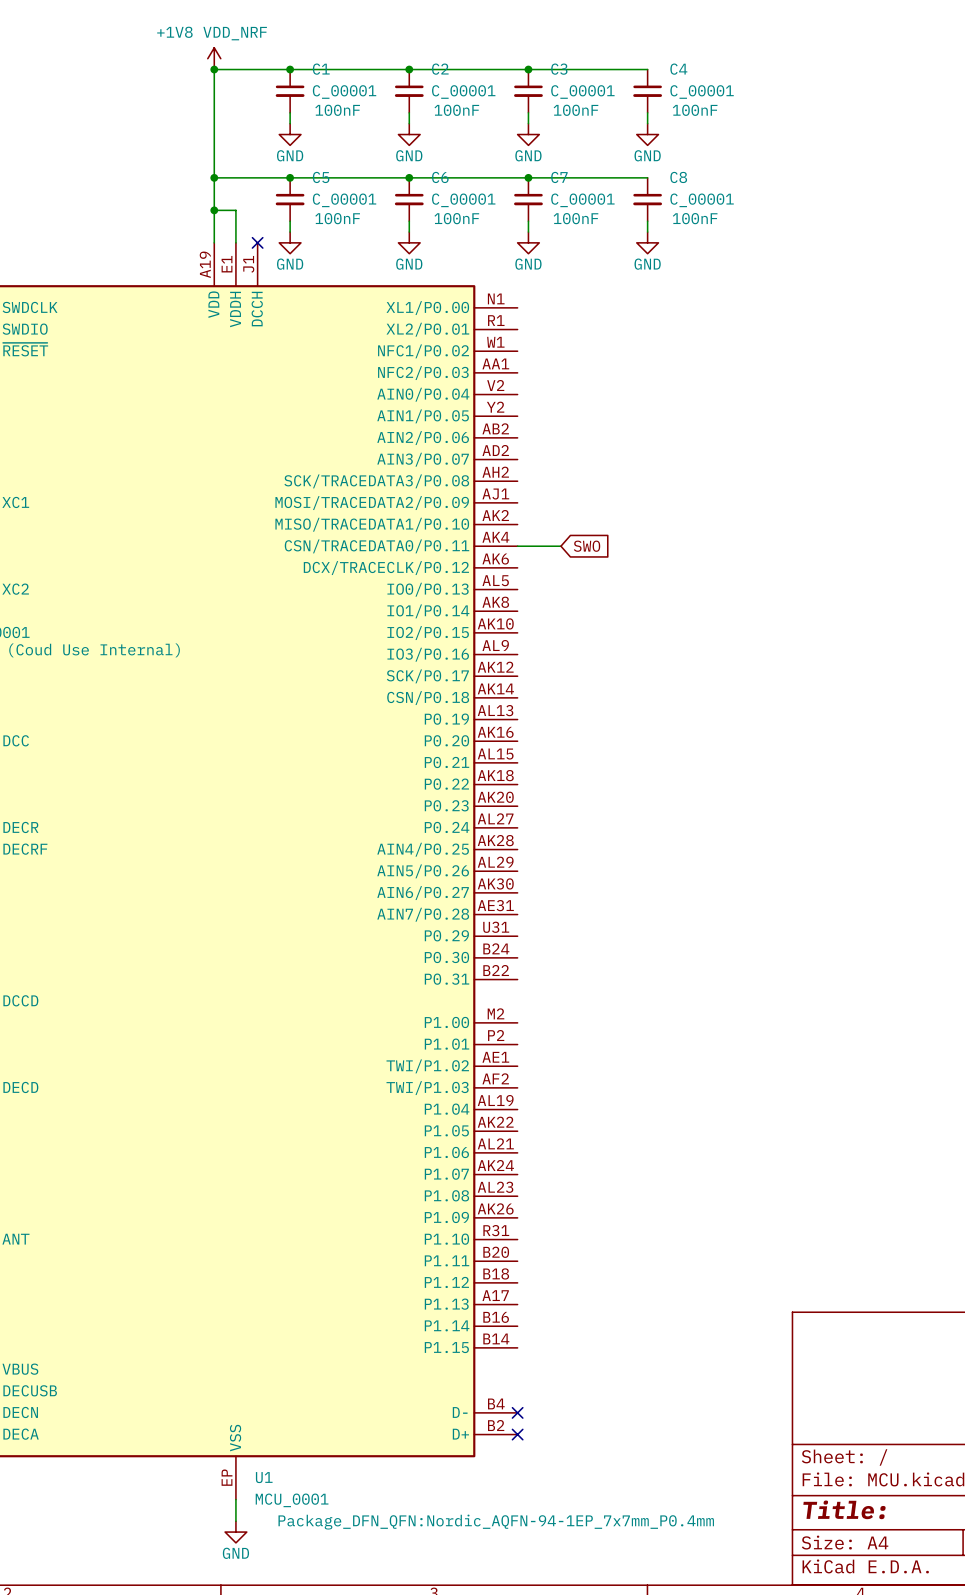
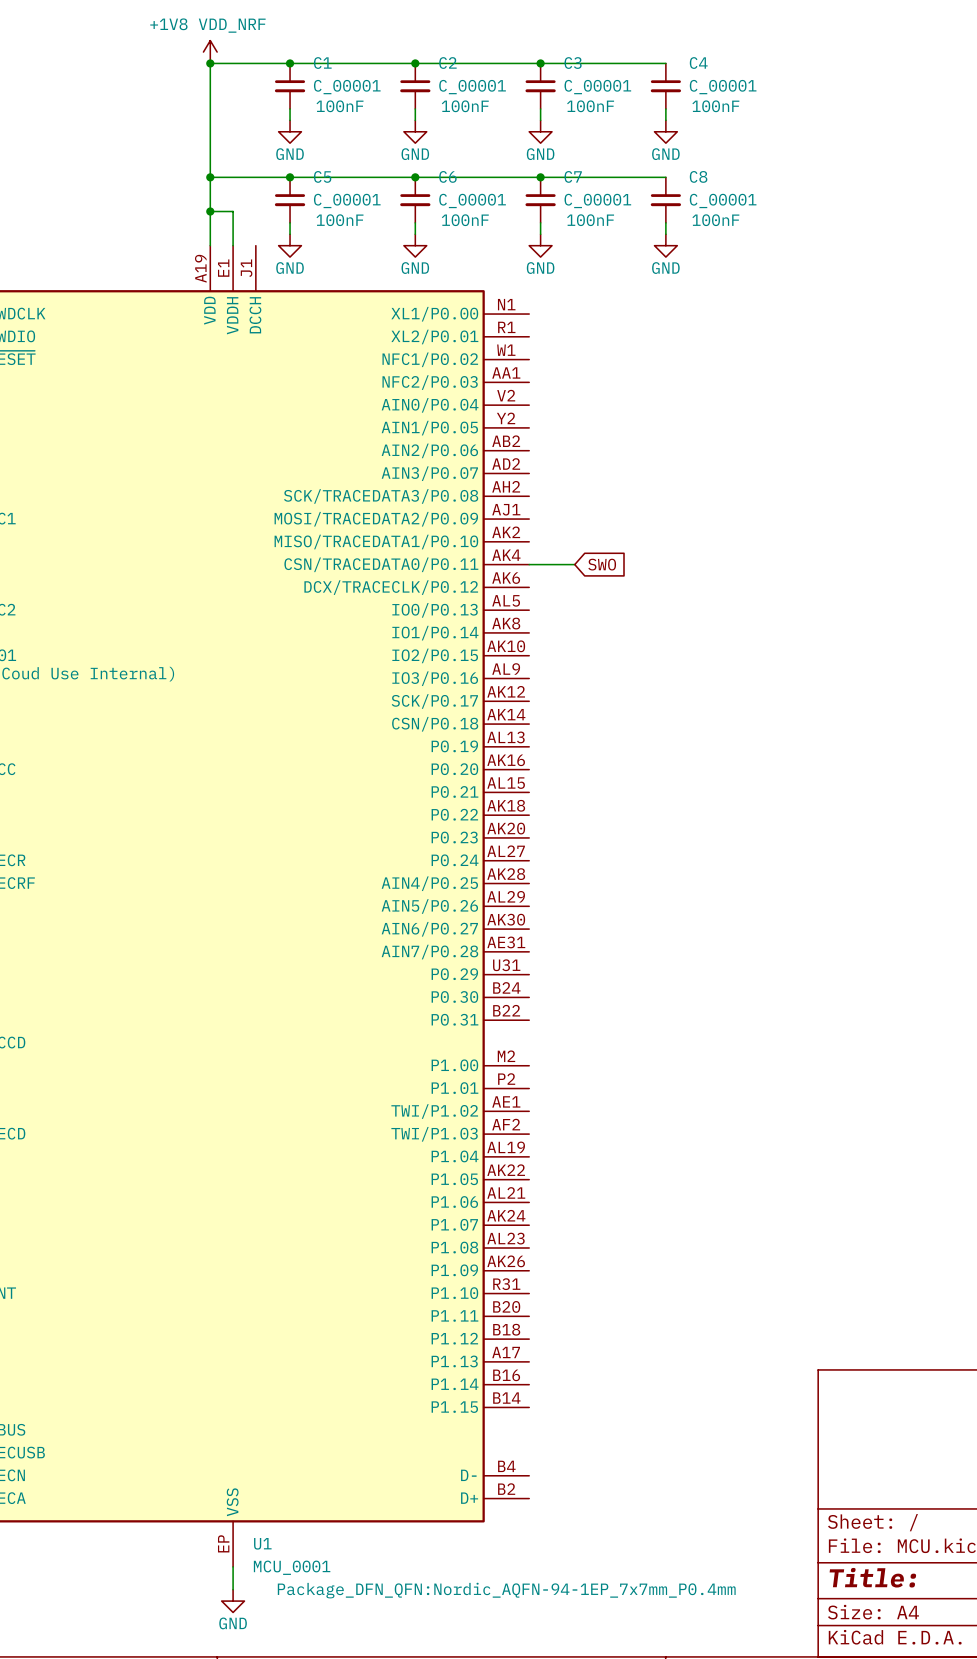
no-connect mark: (257, 242) -> none
no-connect mark: (517, 1412) -> none
no-connect mark: (517, 1434) -> none

